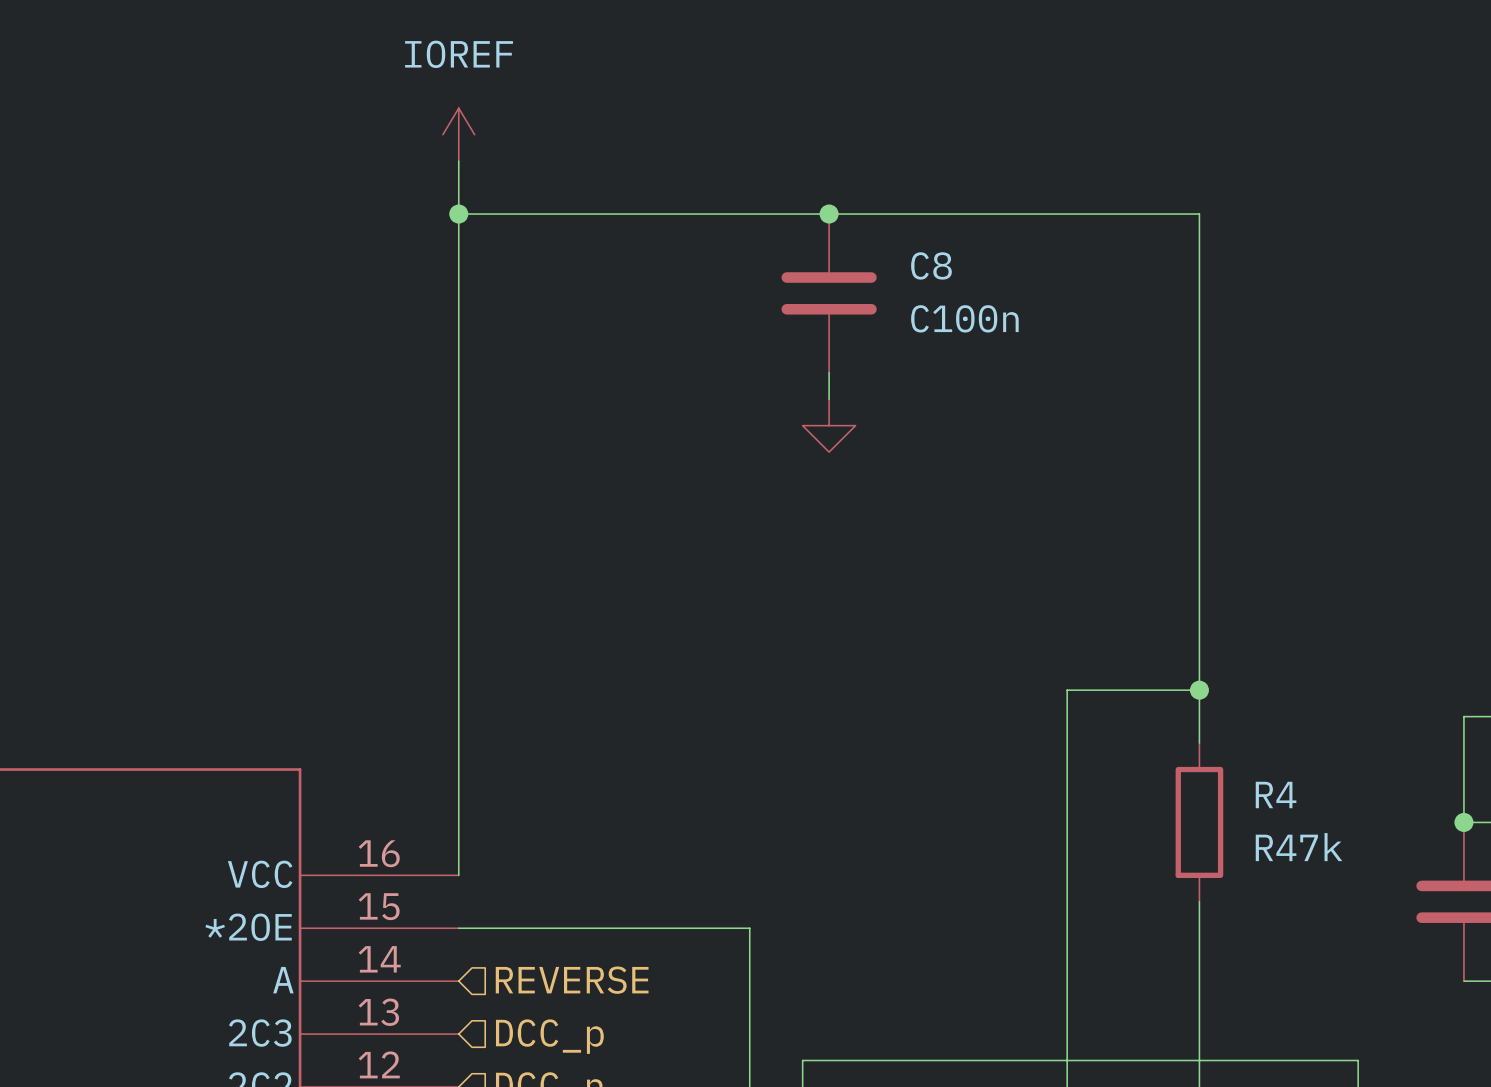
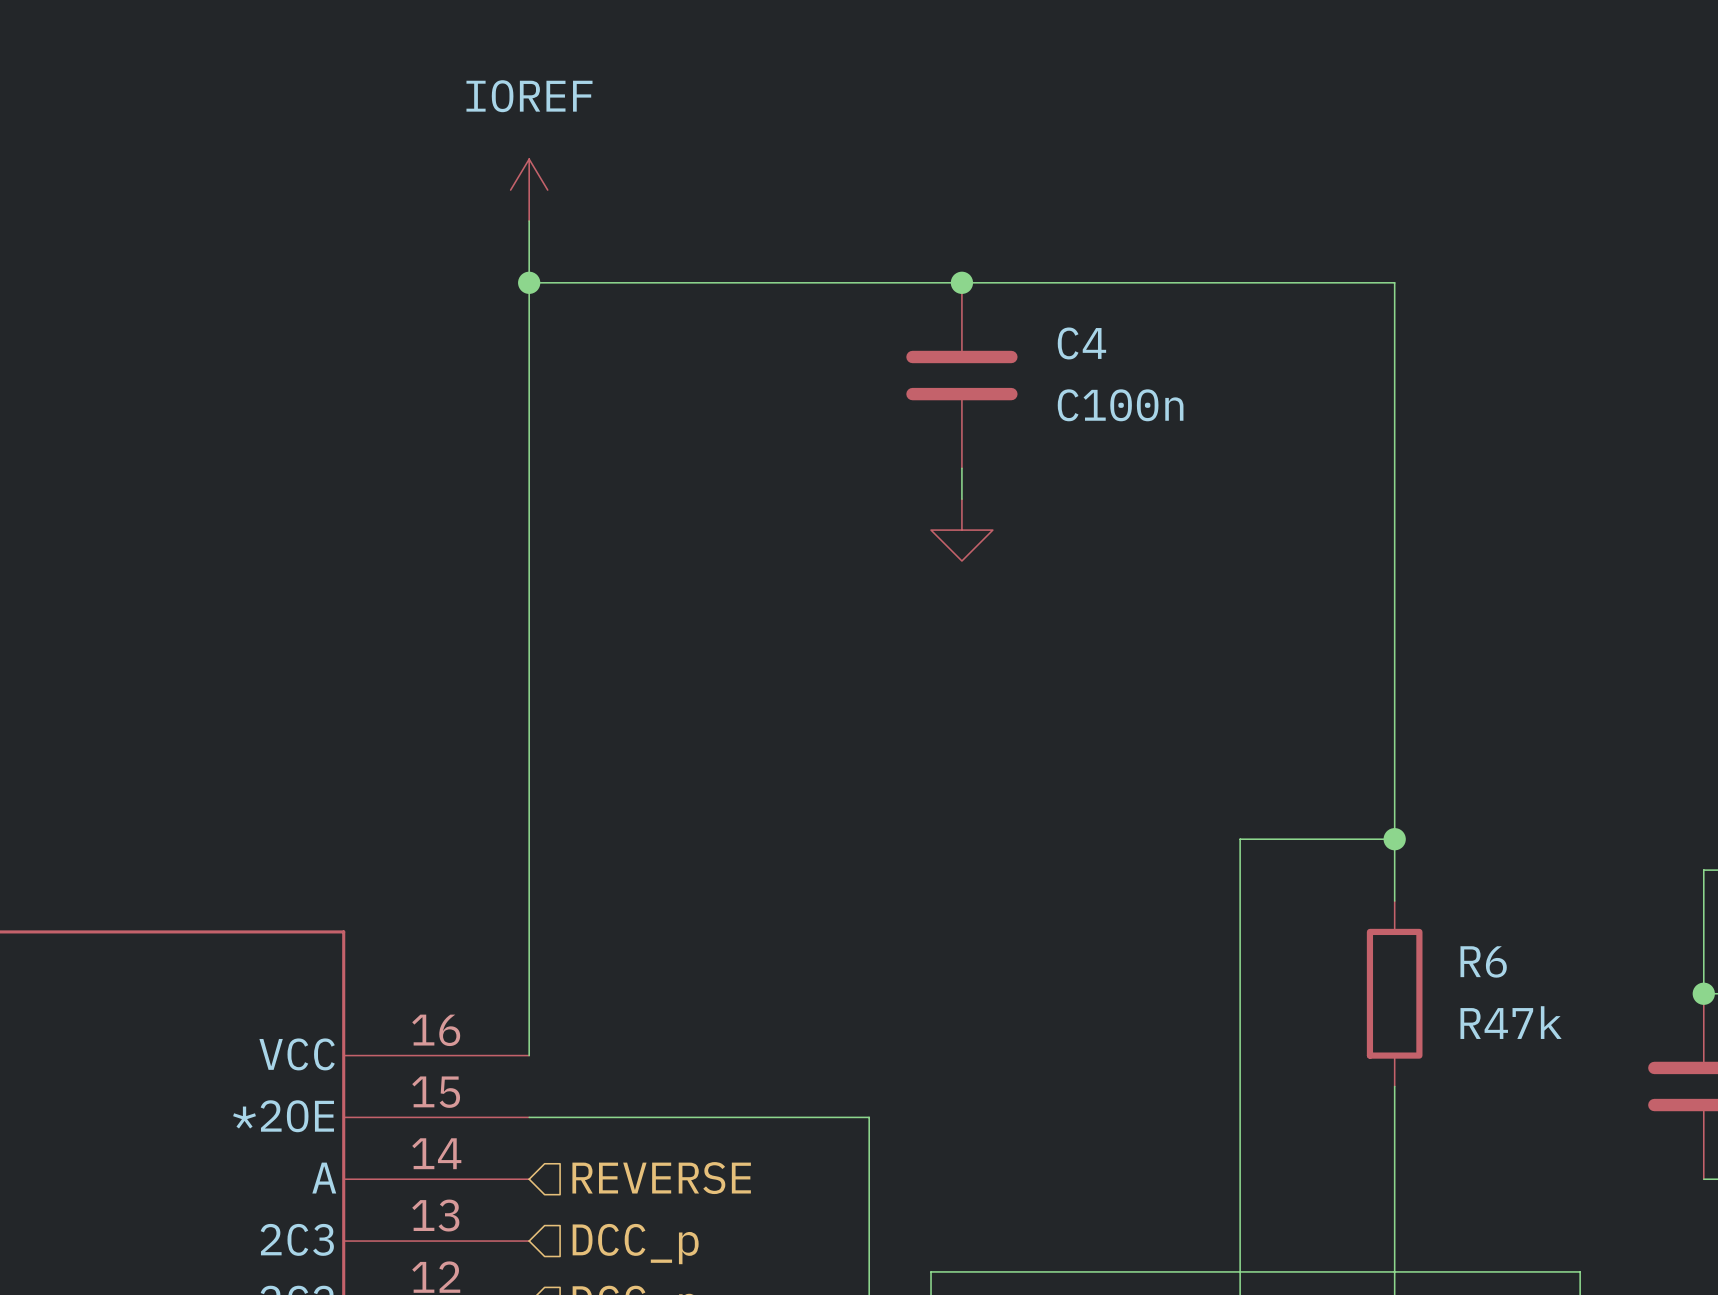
C8 name: C8 (931, 265) -> C4 (1081, 343)
R4 name: R4 (1276, 794) -> R6 (1483, 961)

